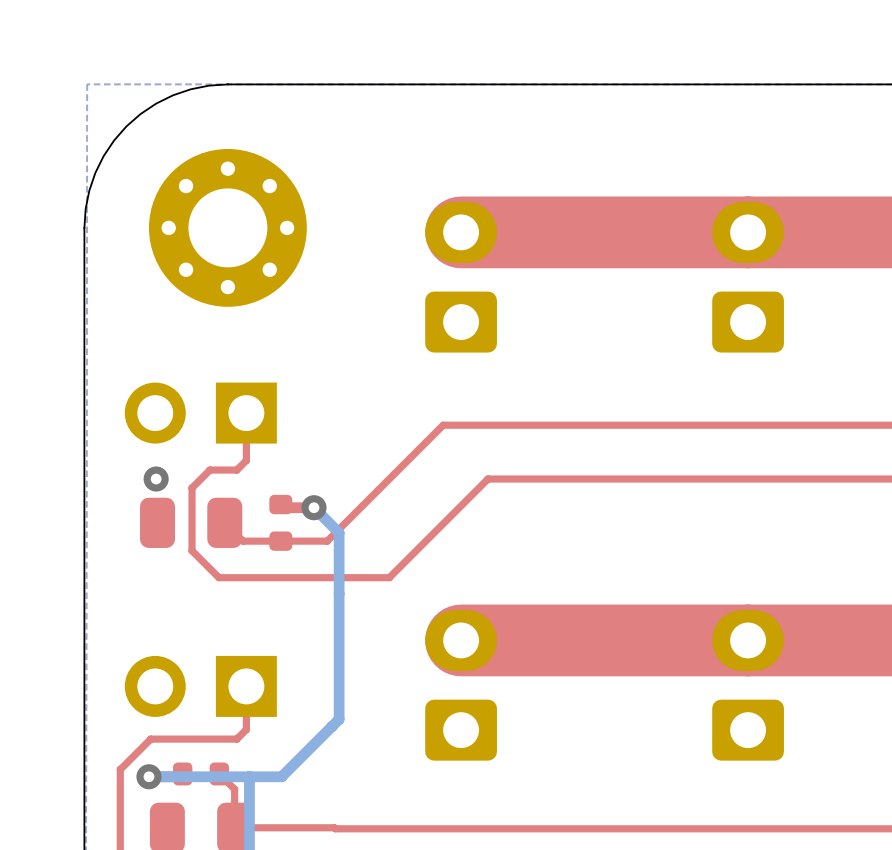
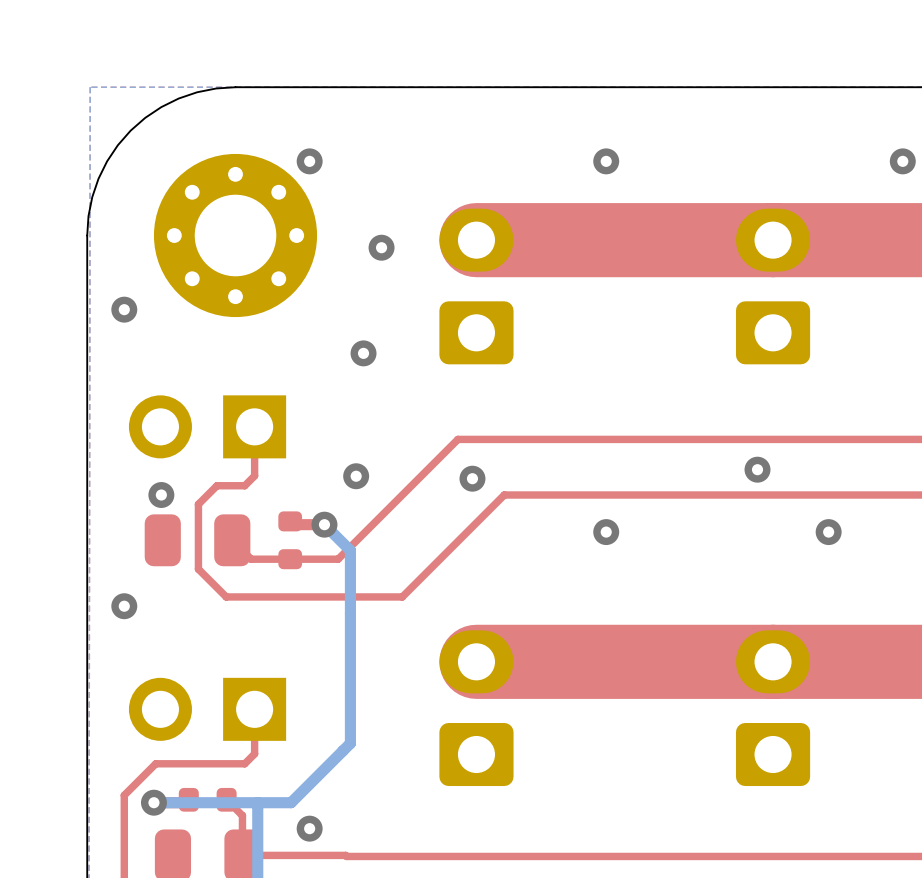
via: none -> (309, 161)
via: none -> (606, 161)
via: none -> (902, 161)
via: none -> (381, 247)
via: none -> (124, 309)
via: none -> (363, 353)
via: none -> (757, 469)
via: none -> (356, 476)
via: none -> (472, 478)
via: none -> (606, 532)
via: none -> (828, 532)
via: none -> (124, 606)
via: none -> (309, 828)

